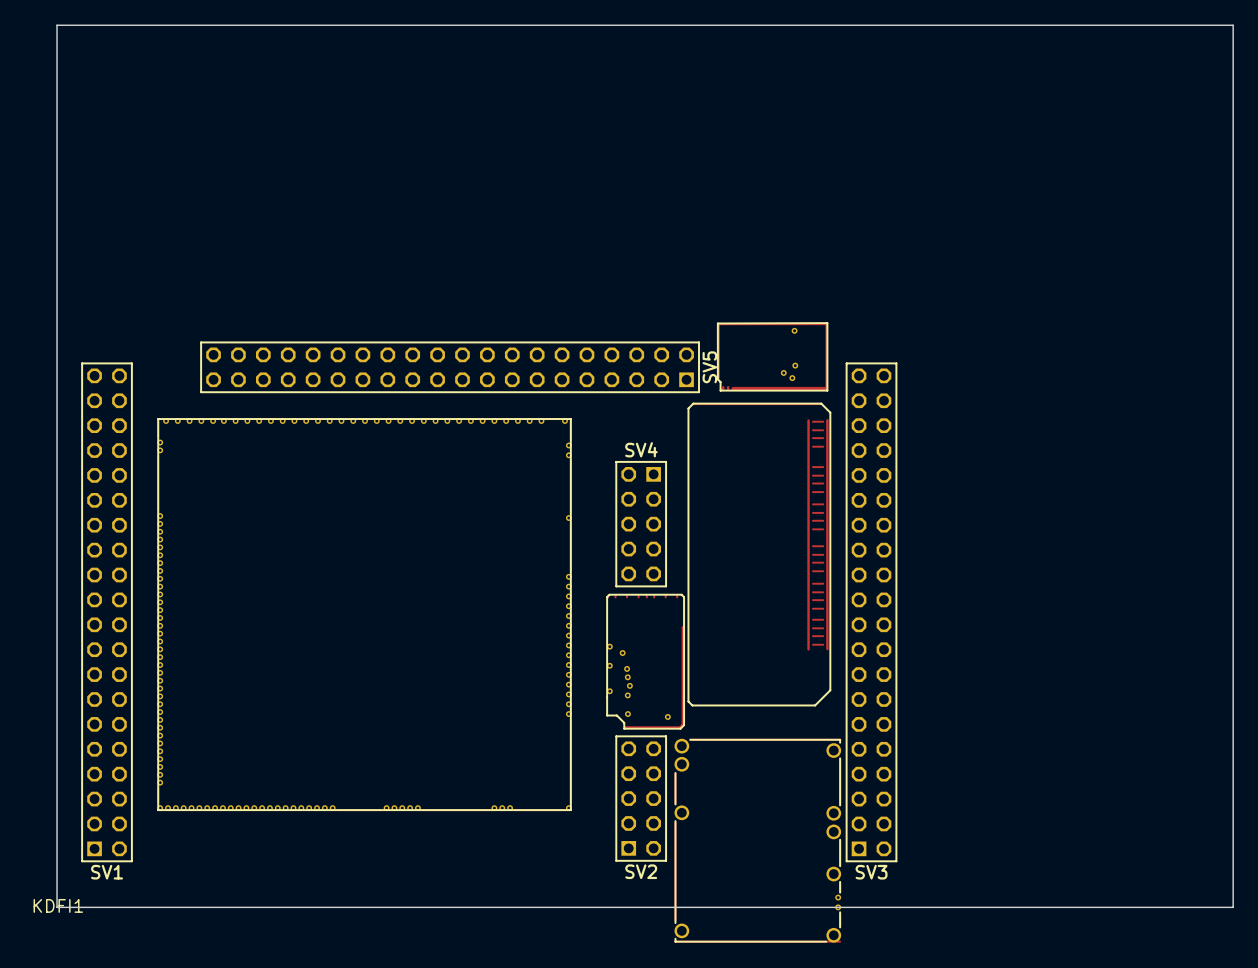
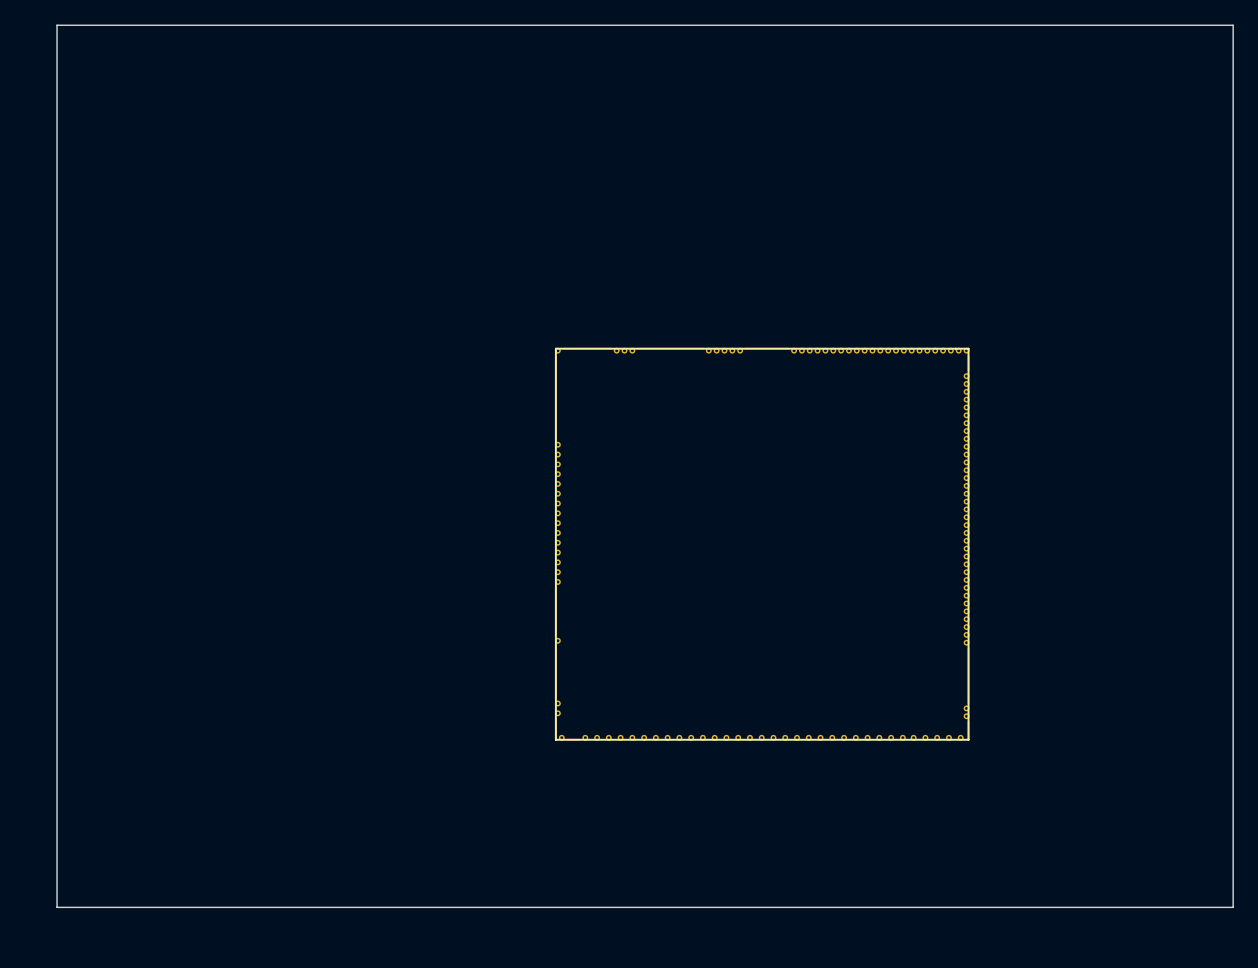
part: (772, 356) -> none
part: none -> (762, 544)
part: (759, 554) -> none
KDFI1: (489, 601) -> none
part: (364, 614) -> none
part: (645, 661) -> none
part: (757, 840) -> none

